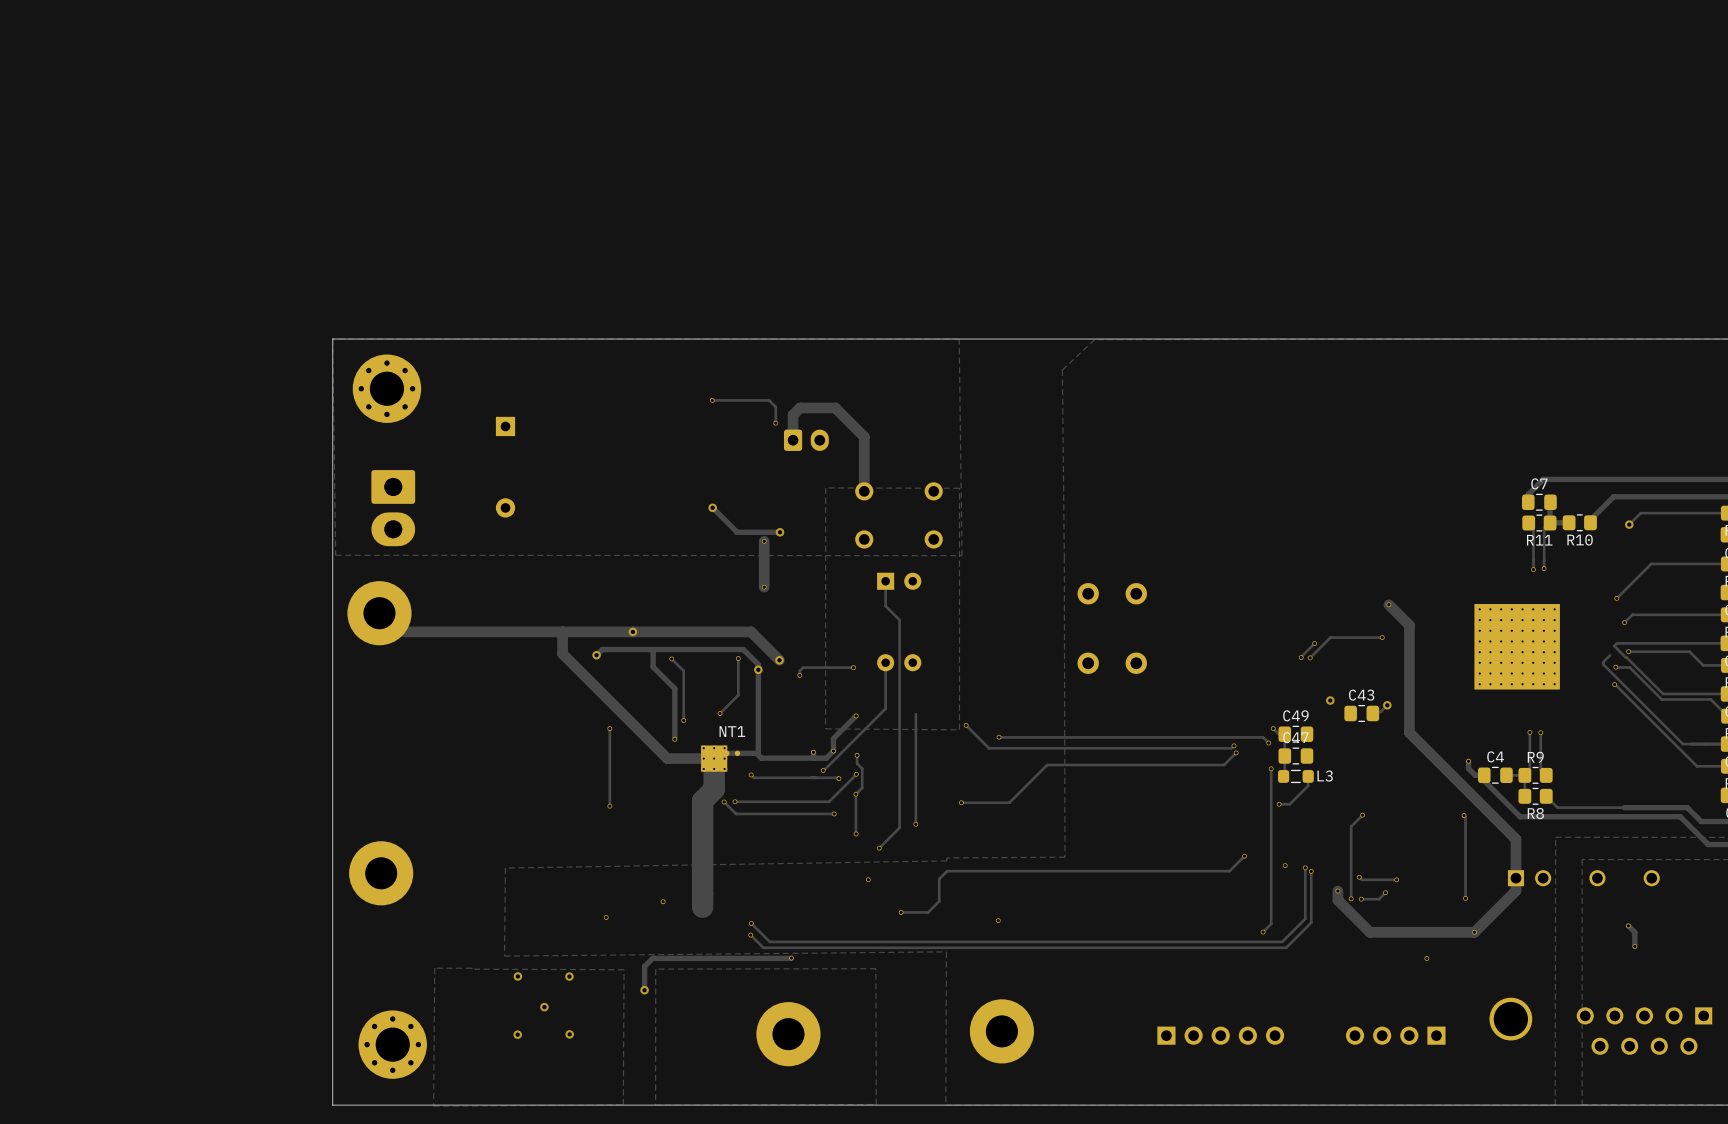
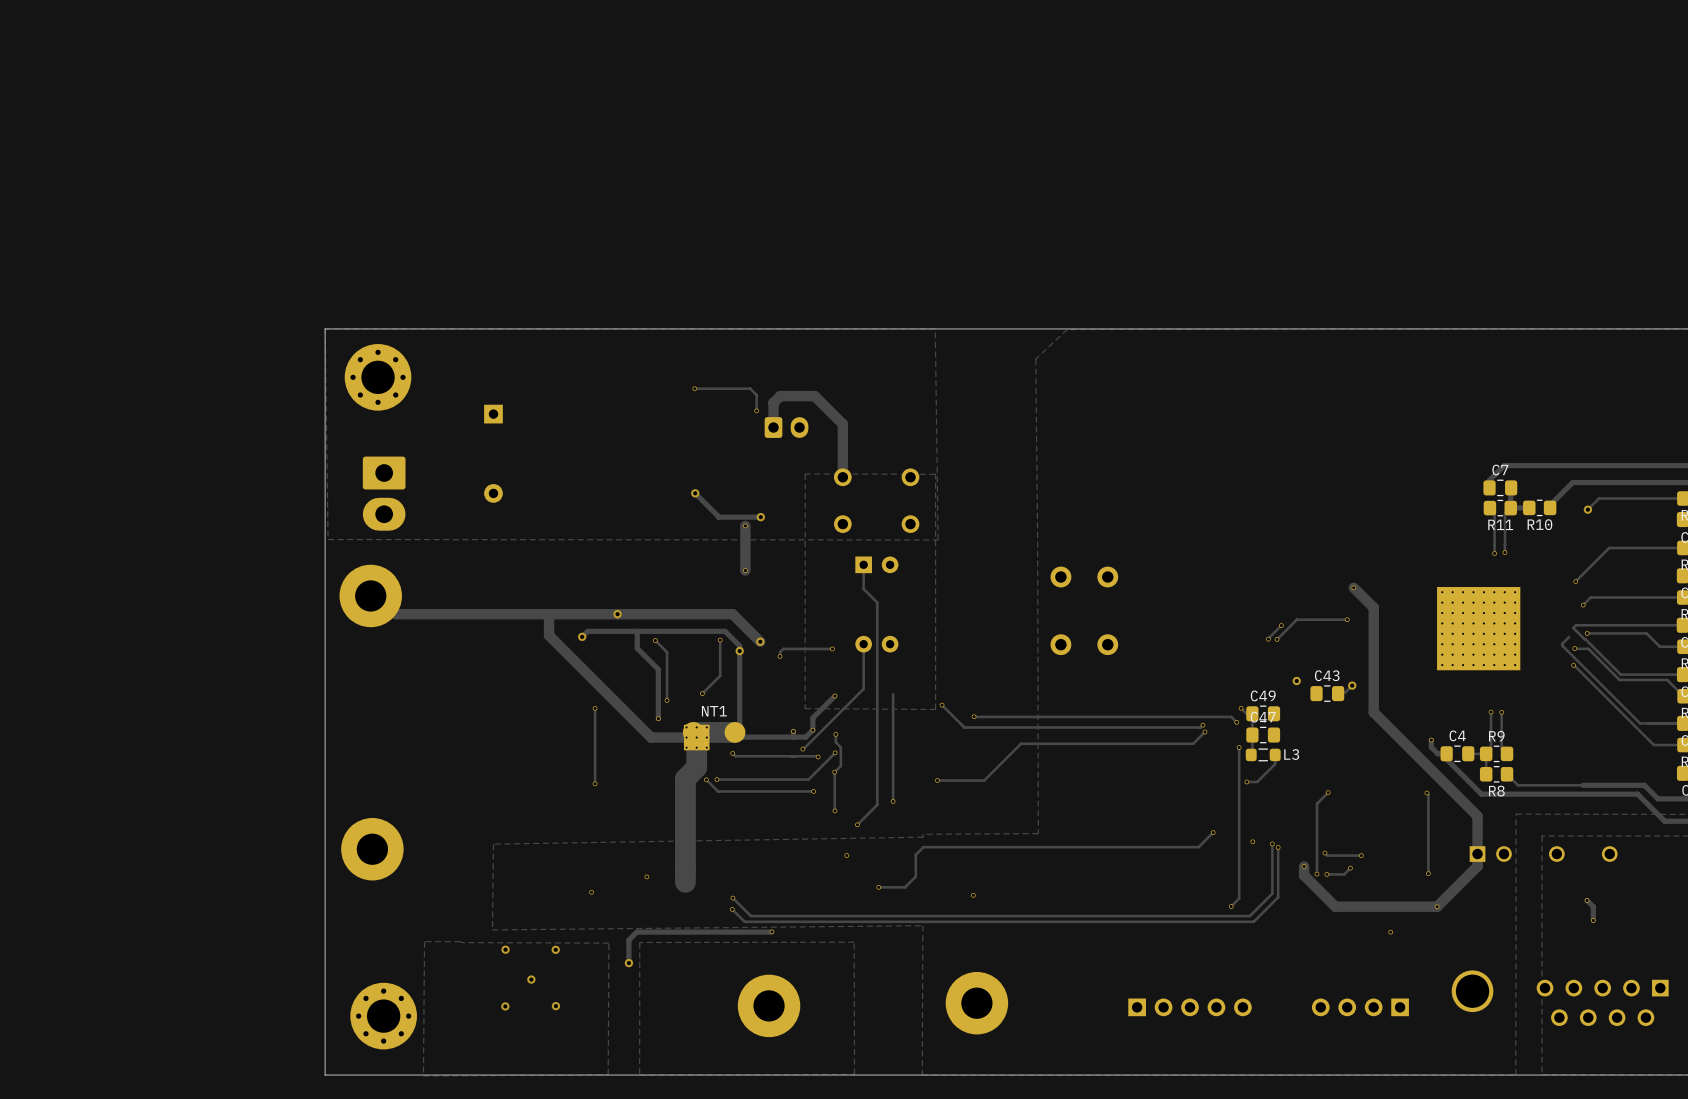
NT1 footprint: [724, 750, 741, 757] -> [682, 722, 746, 743]

